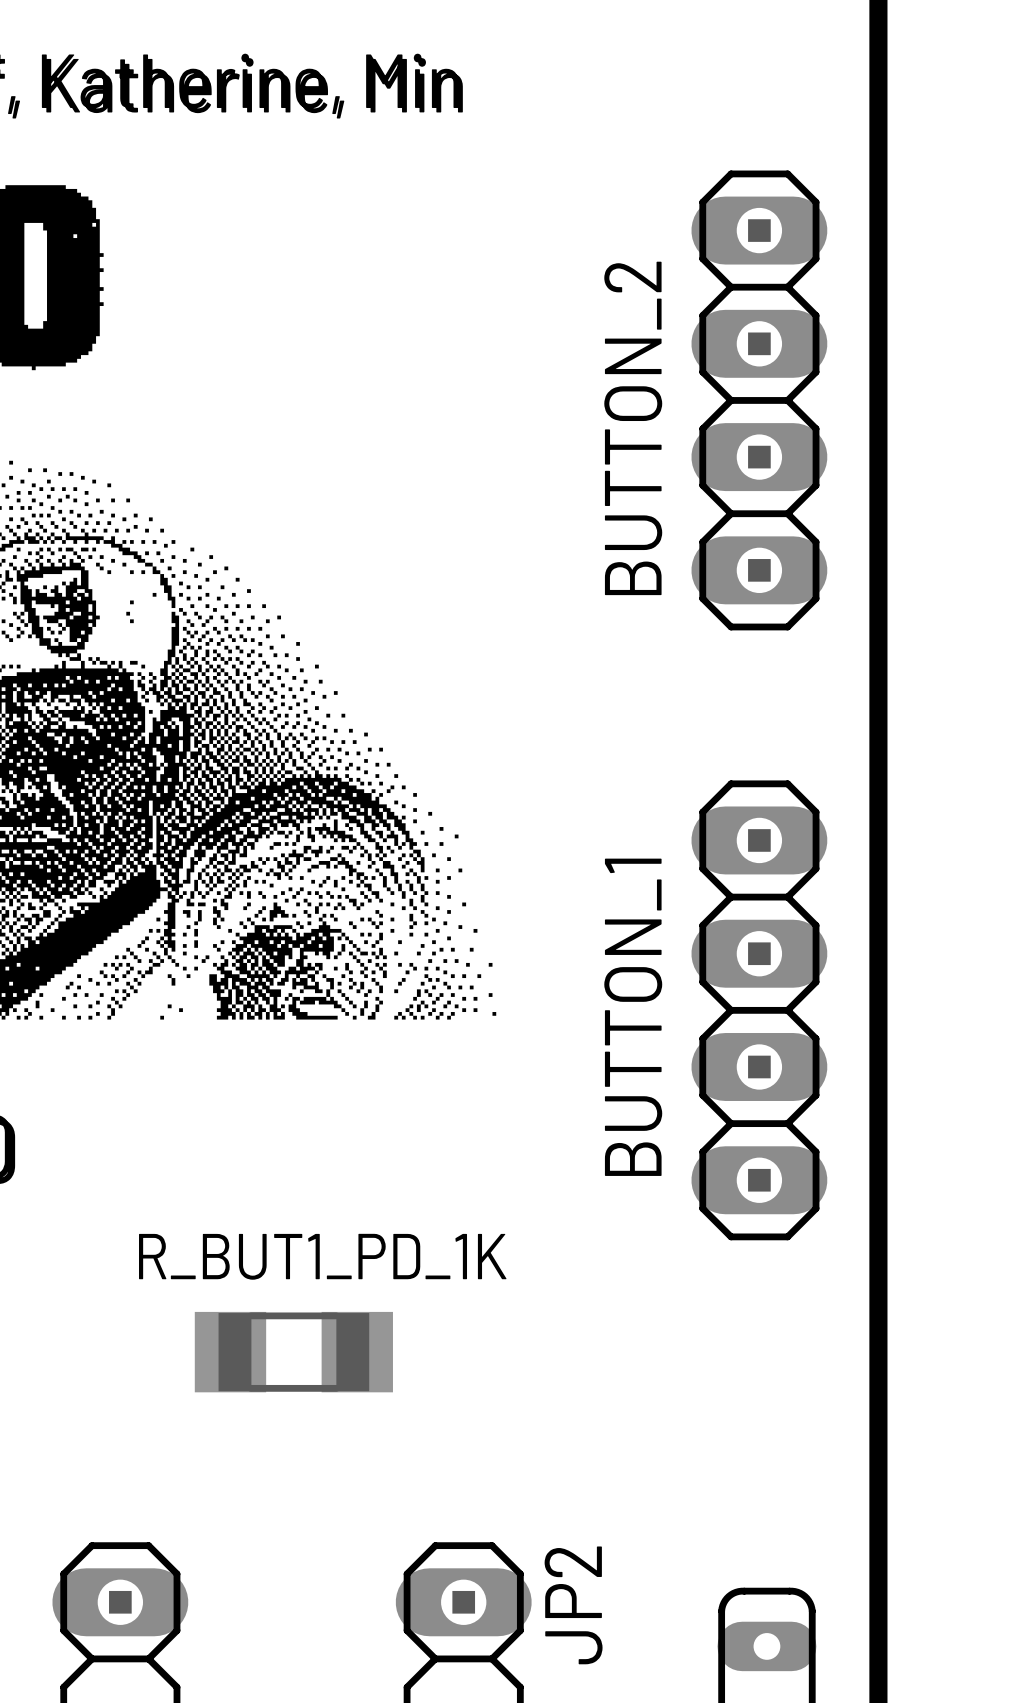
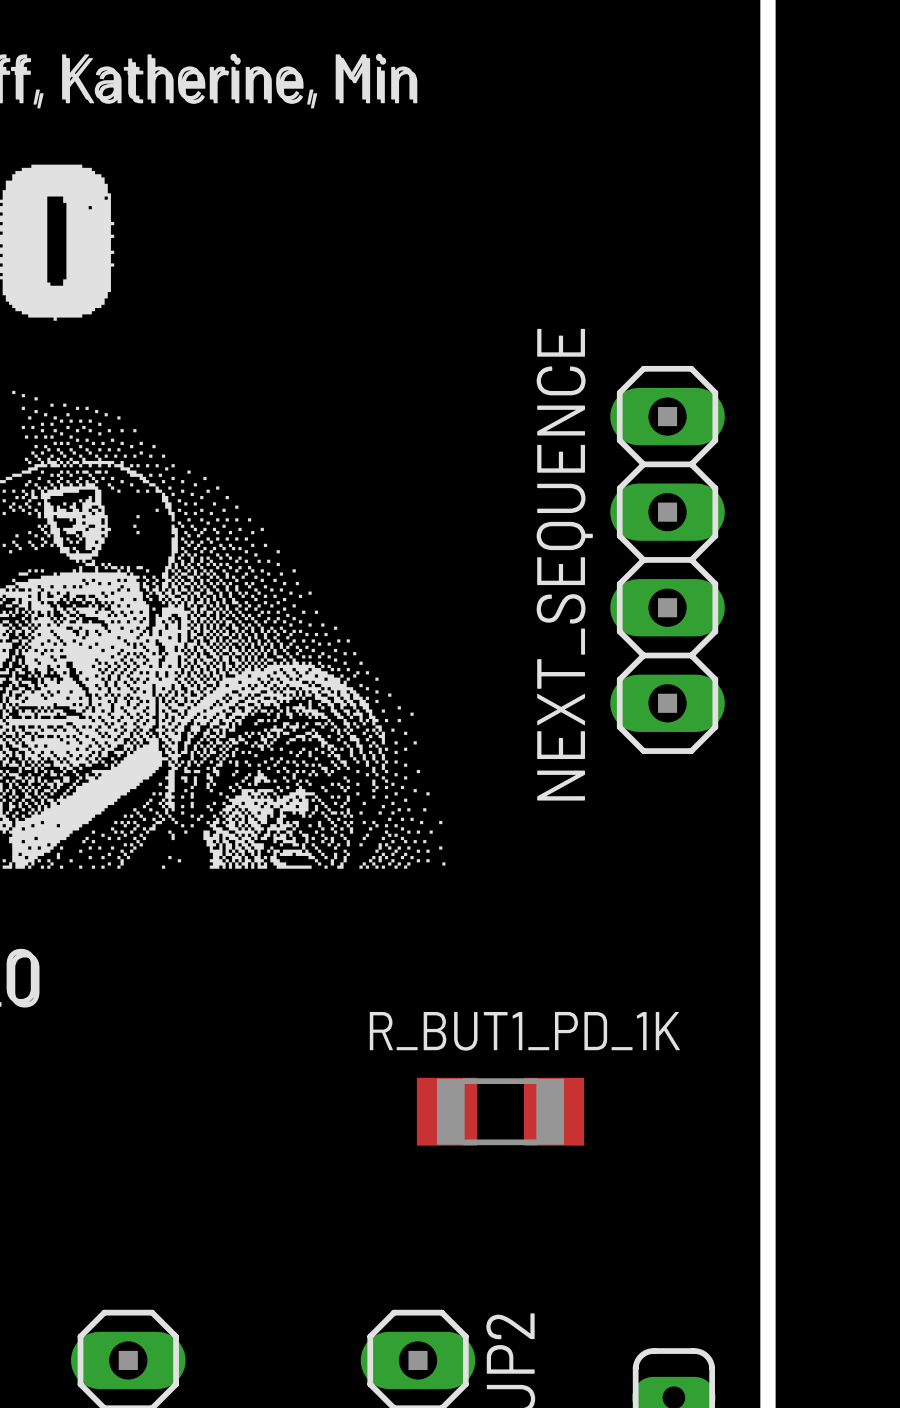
BUTTON_2: (759, 400) -> none
NEXT_SEQUENCE: none -> (667, 559)
BUTTON_1: (759, 1010) -> none
R_BUT1_PD_1K position: (293, 1352) -> (500, 1111)

